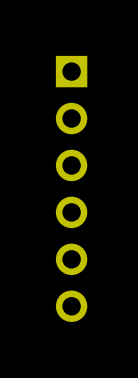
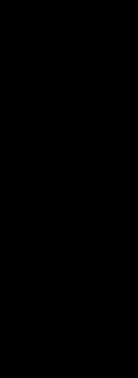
part: (71, 188) -> none

